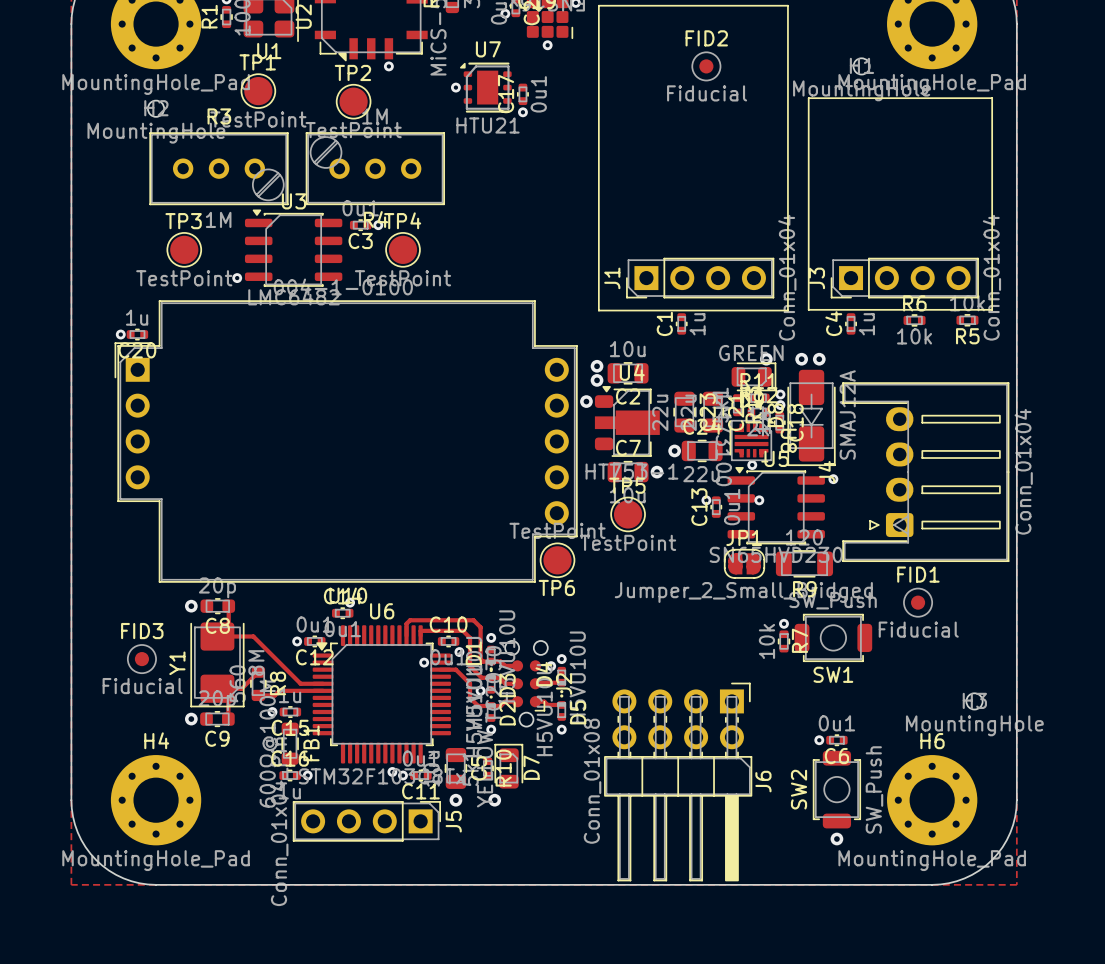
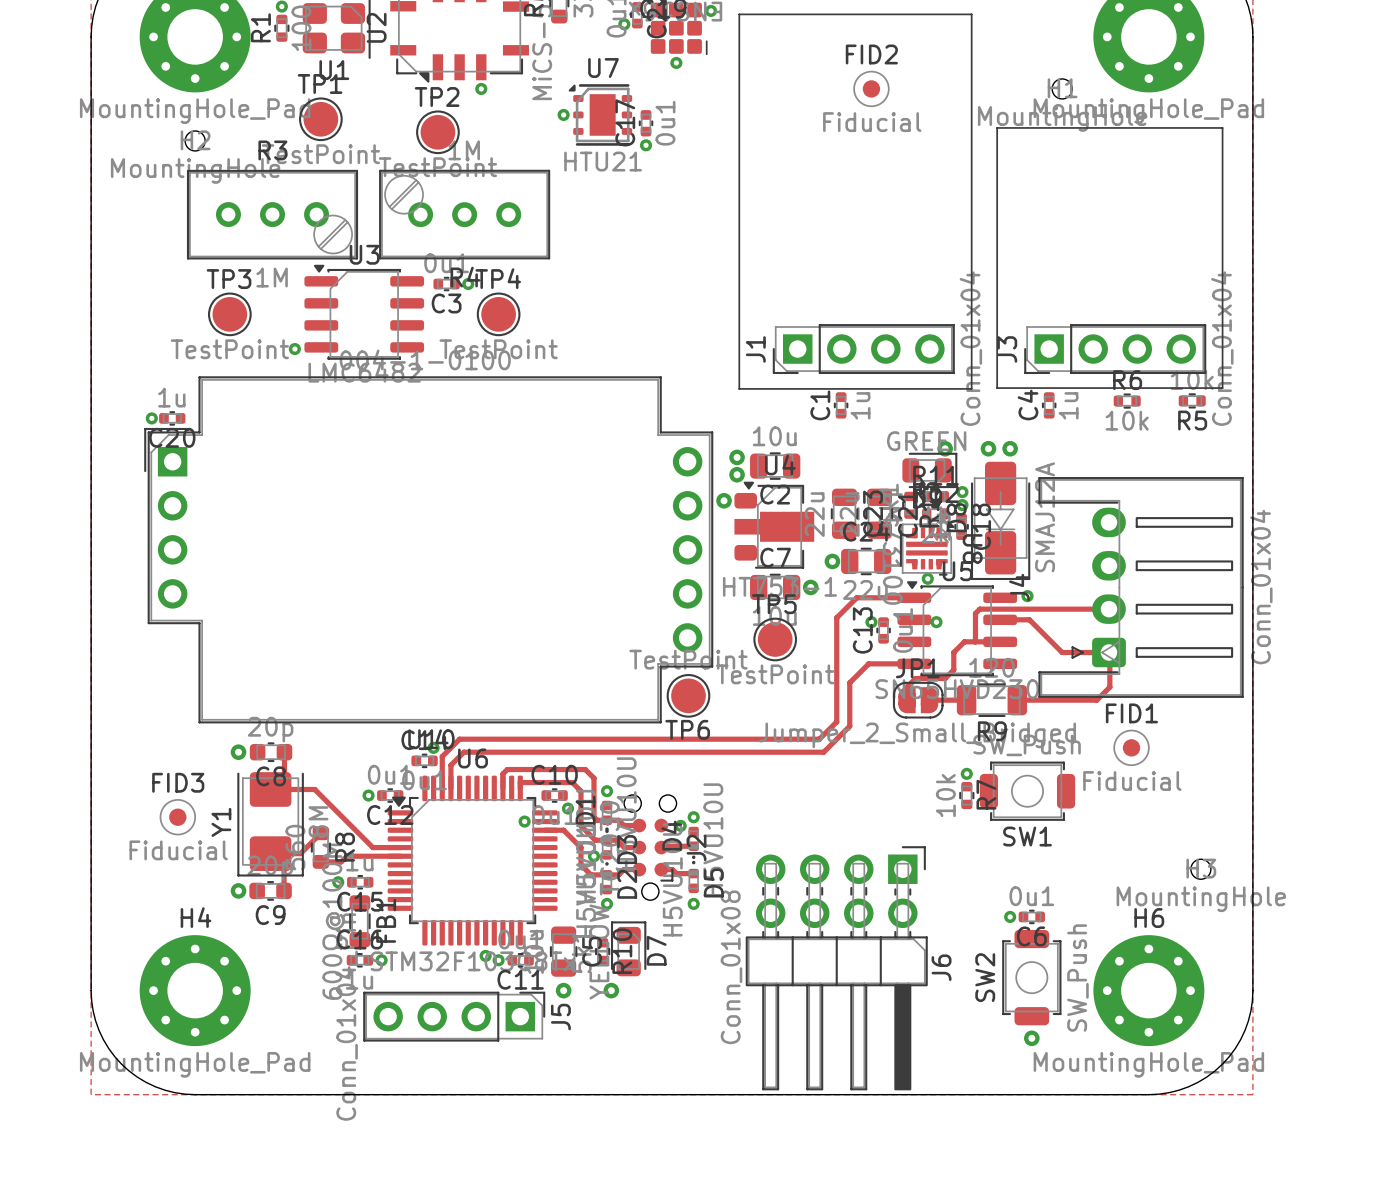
track: none -> (914, 597) (856, 597) (836, 617) (836, 721) (819, 739) (459, 739) (442, 756) (442, 788)
track: none -> (1108, 609) (979, 609) (975, 613) (975, 641)
track: none -> (1000, 619) (1029, 619) (1062, 652) (1109, 652) (1109, 687) (1096, 700) (1017, 700)
track: none -> (1000, 641) (964, 641) (953, 652) (953, 669) (945, 678) (915, 678) (906, 687) (906, 700)
track: none -> (914, 663) (868, 663) (849, 682) (849, 726) (823, 752) (463, 752) (450, 765) (450, 788)
track: none -> (929, 700) (966, 700)

